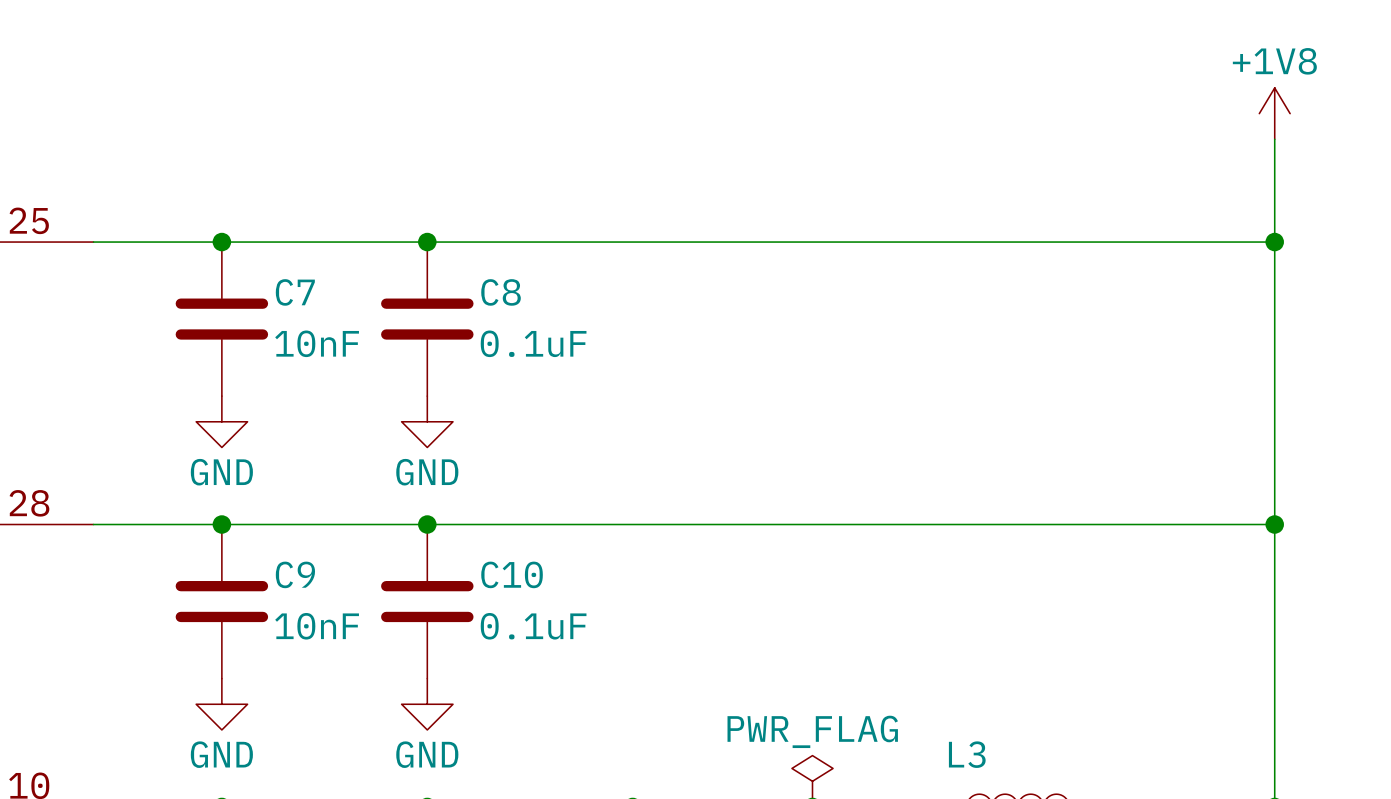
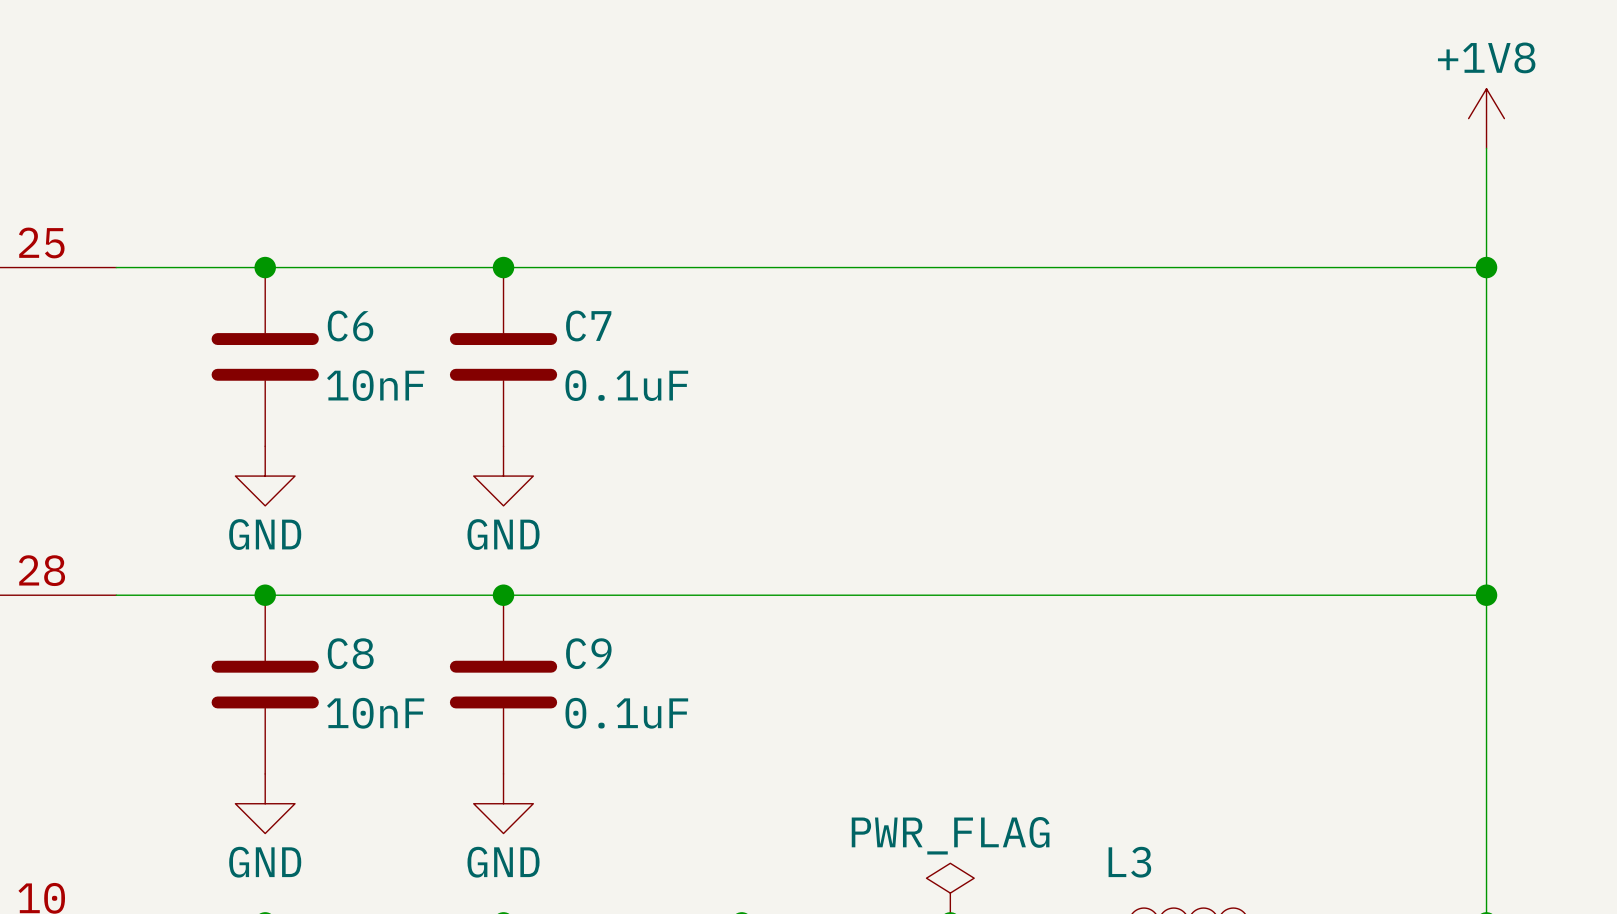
C7 name: C7 (295, 292) -> C6 (350, 326)
C8 name: C8 (501, 292) -> C7 (588, 326)
C9 name: C9 (295, 574) -> C8 (350, 653)
C10 name: C10 (512, 574) -> C9 (588, 653)

